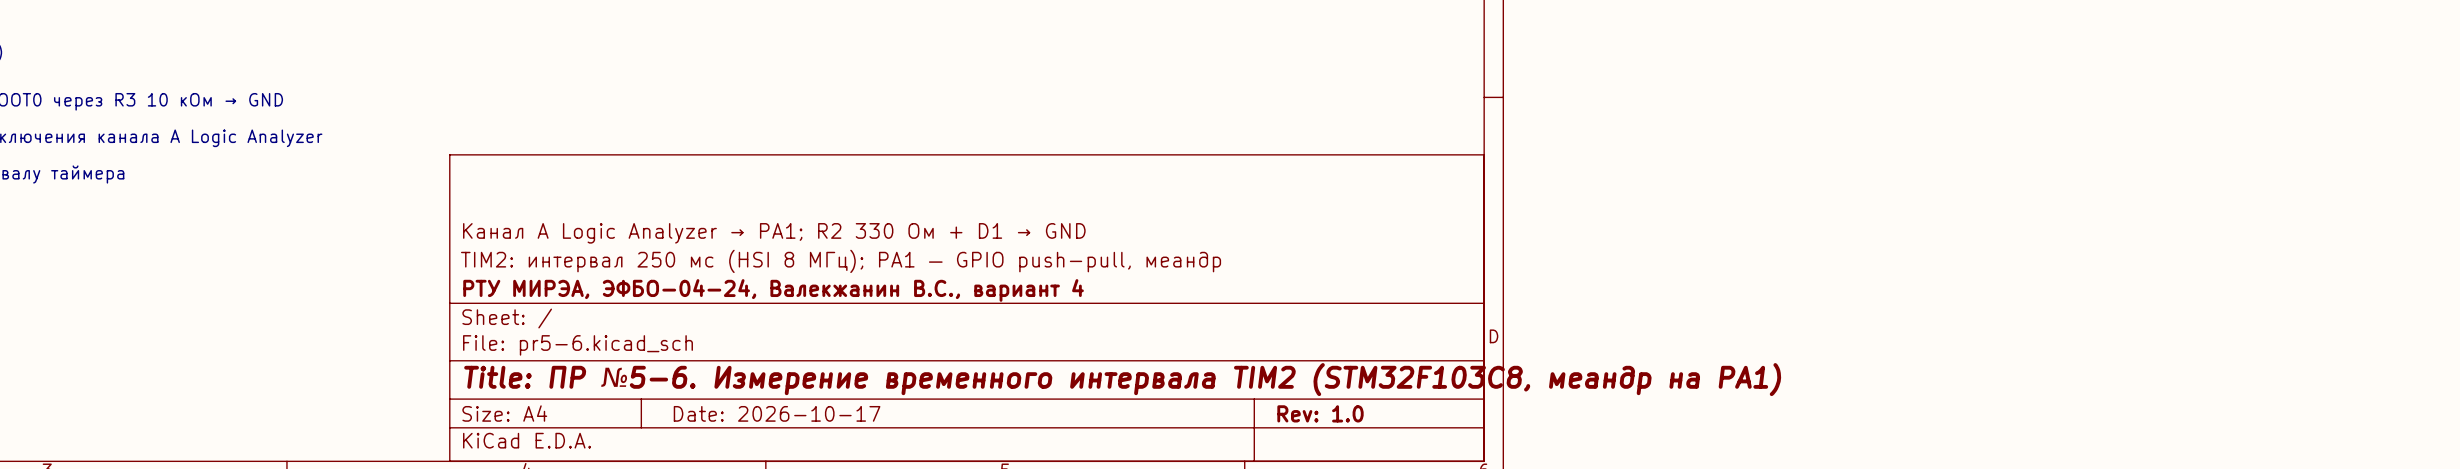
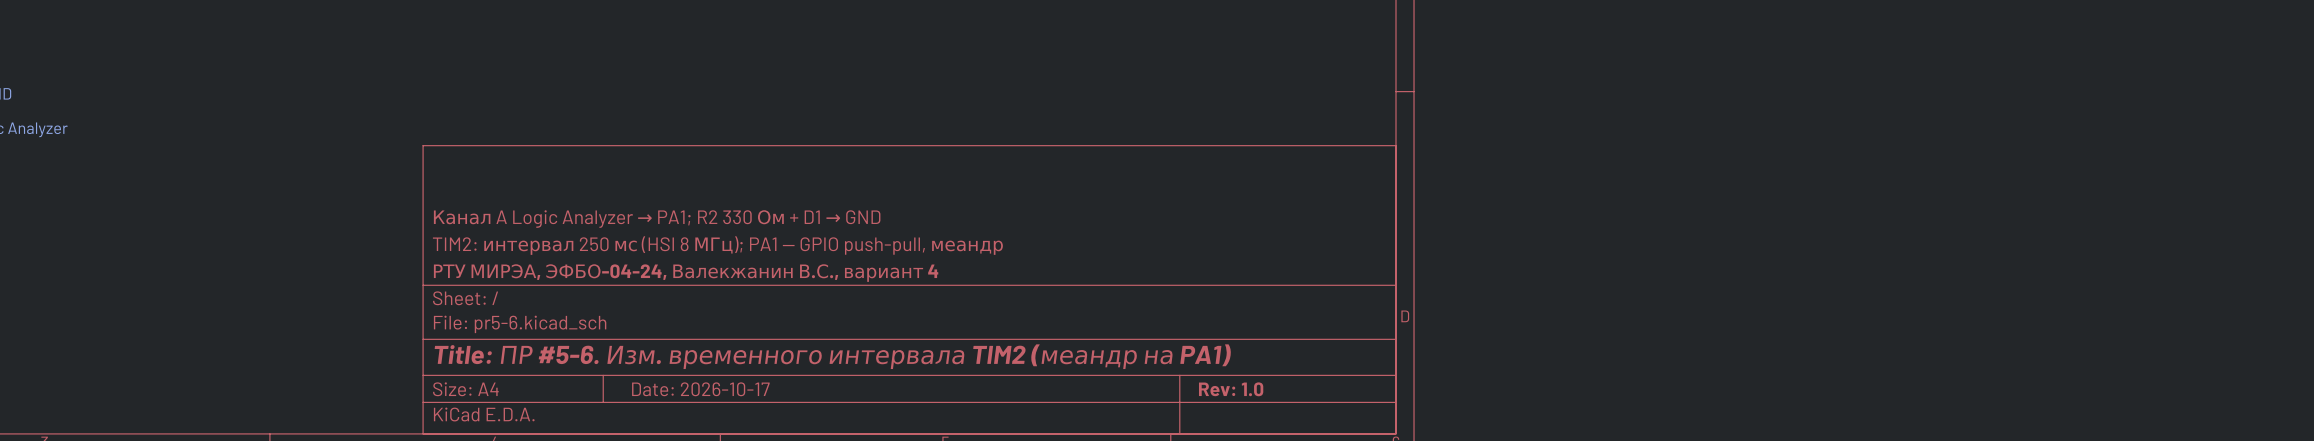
title block: Title: ПР №5-6. Измерение временного интервала TIM2 (STM32F103C8, меандр на PA1) (1122, 379) -> Title: ПР #5-6. Изм. временного интервала TIM2 (меандр на PA1) (832, 356)

